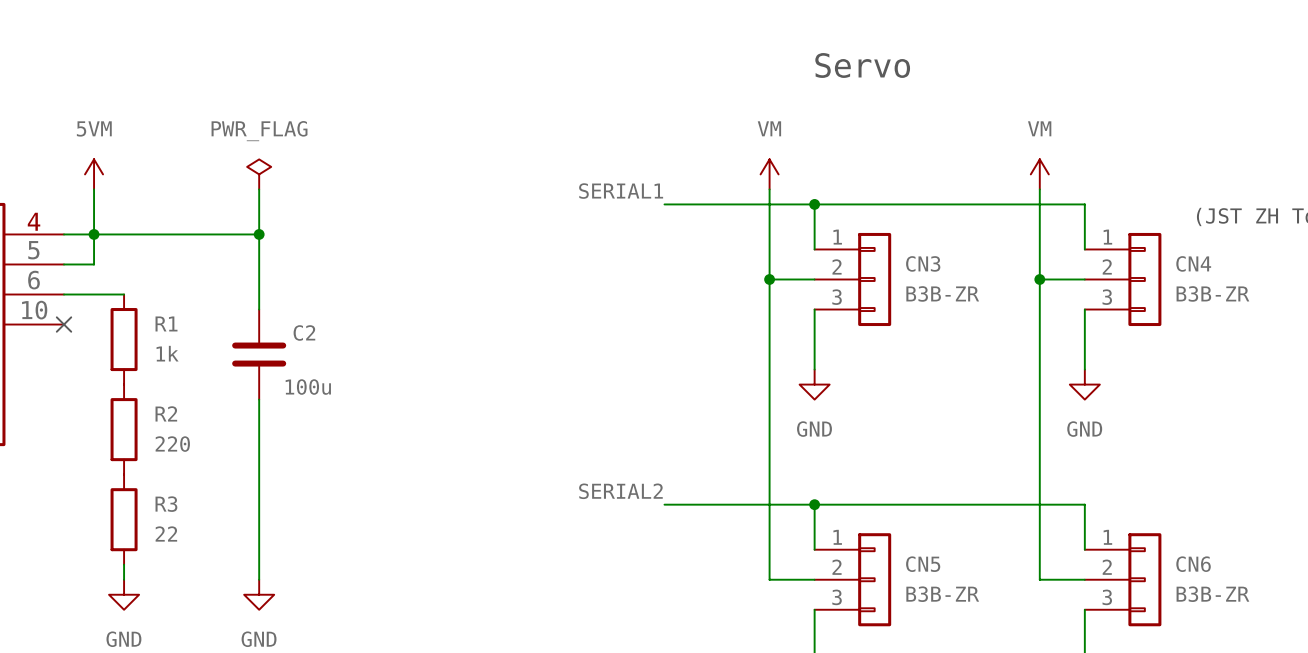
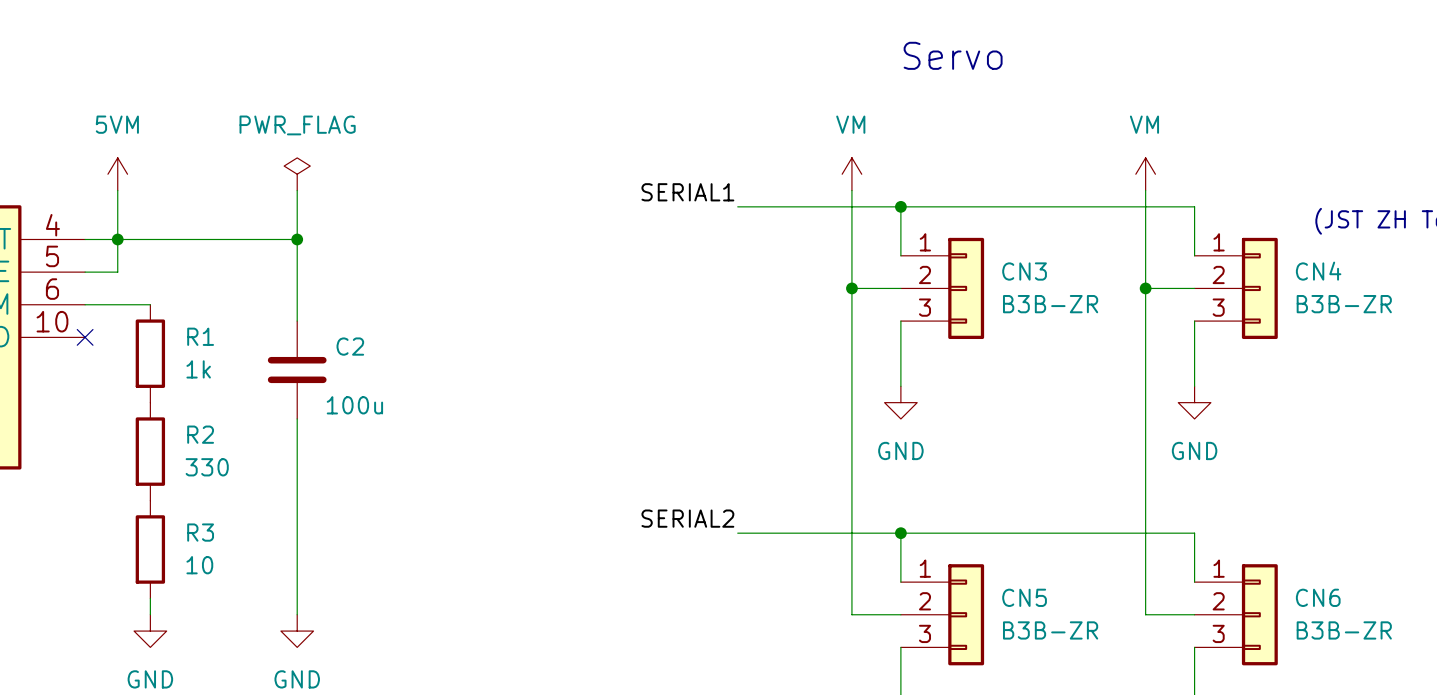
R2 value: 220 (172, 444) -> 330 (207, 467)
R3 value: 22 (166, 534) -> 10 (199, 565)

